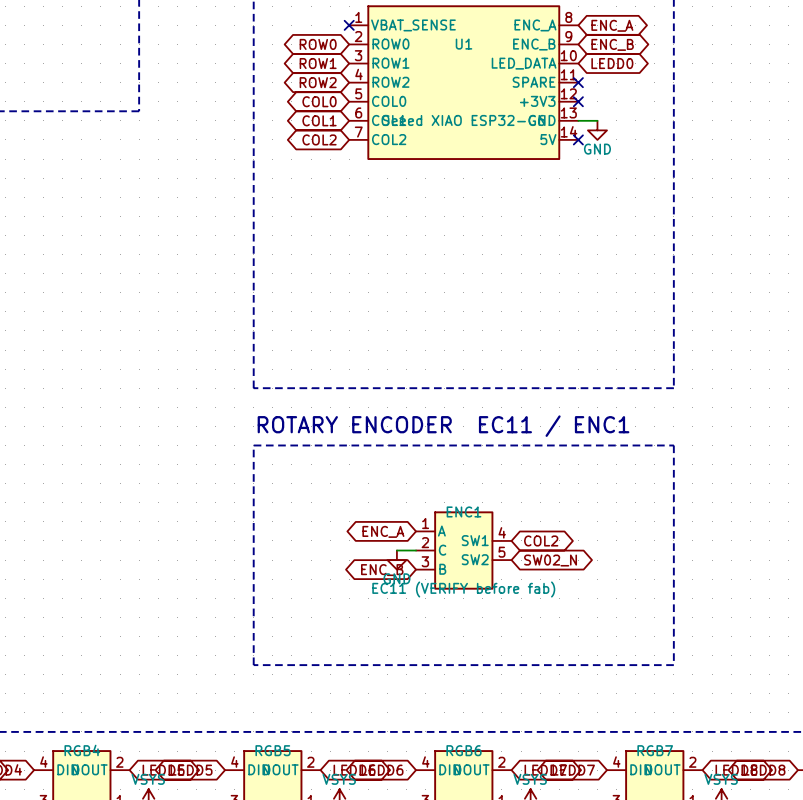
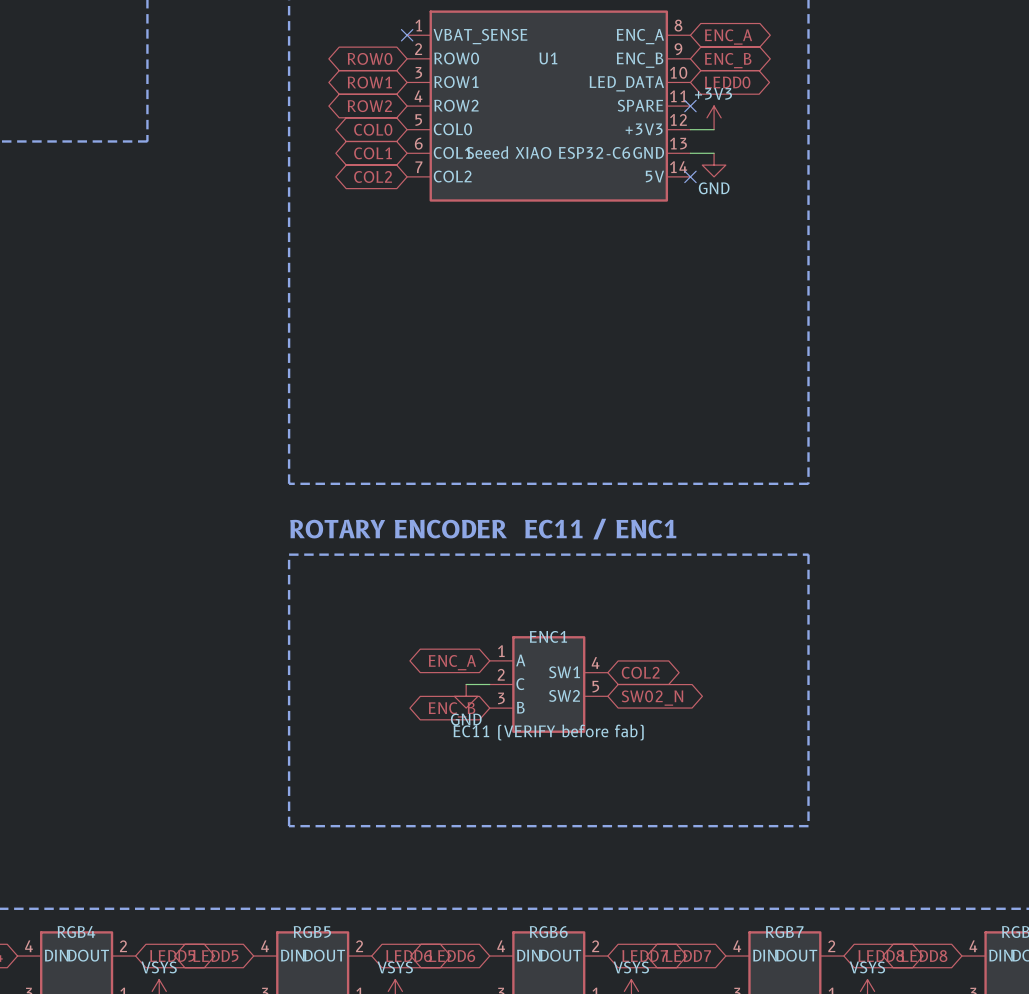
power symbol: none -> +3V3 (714, 117)
wire: none -> (690, 129) (714, 129)
no-connect mark: (578, 101) -> none

